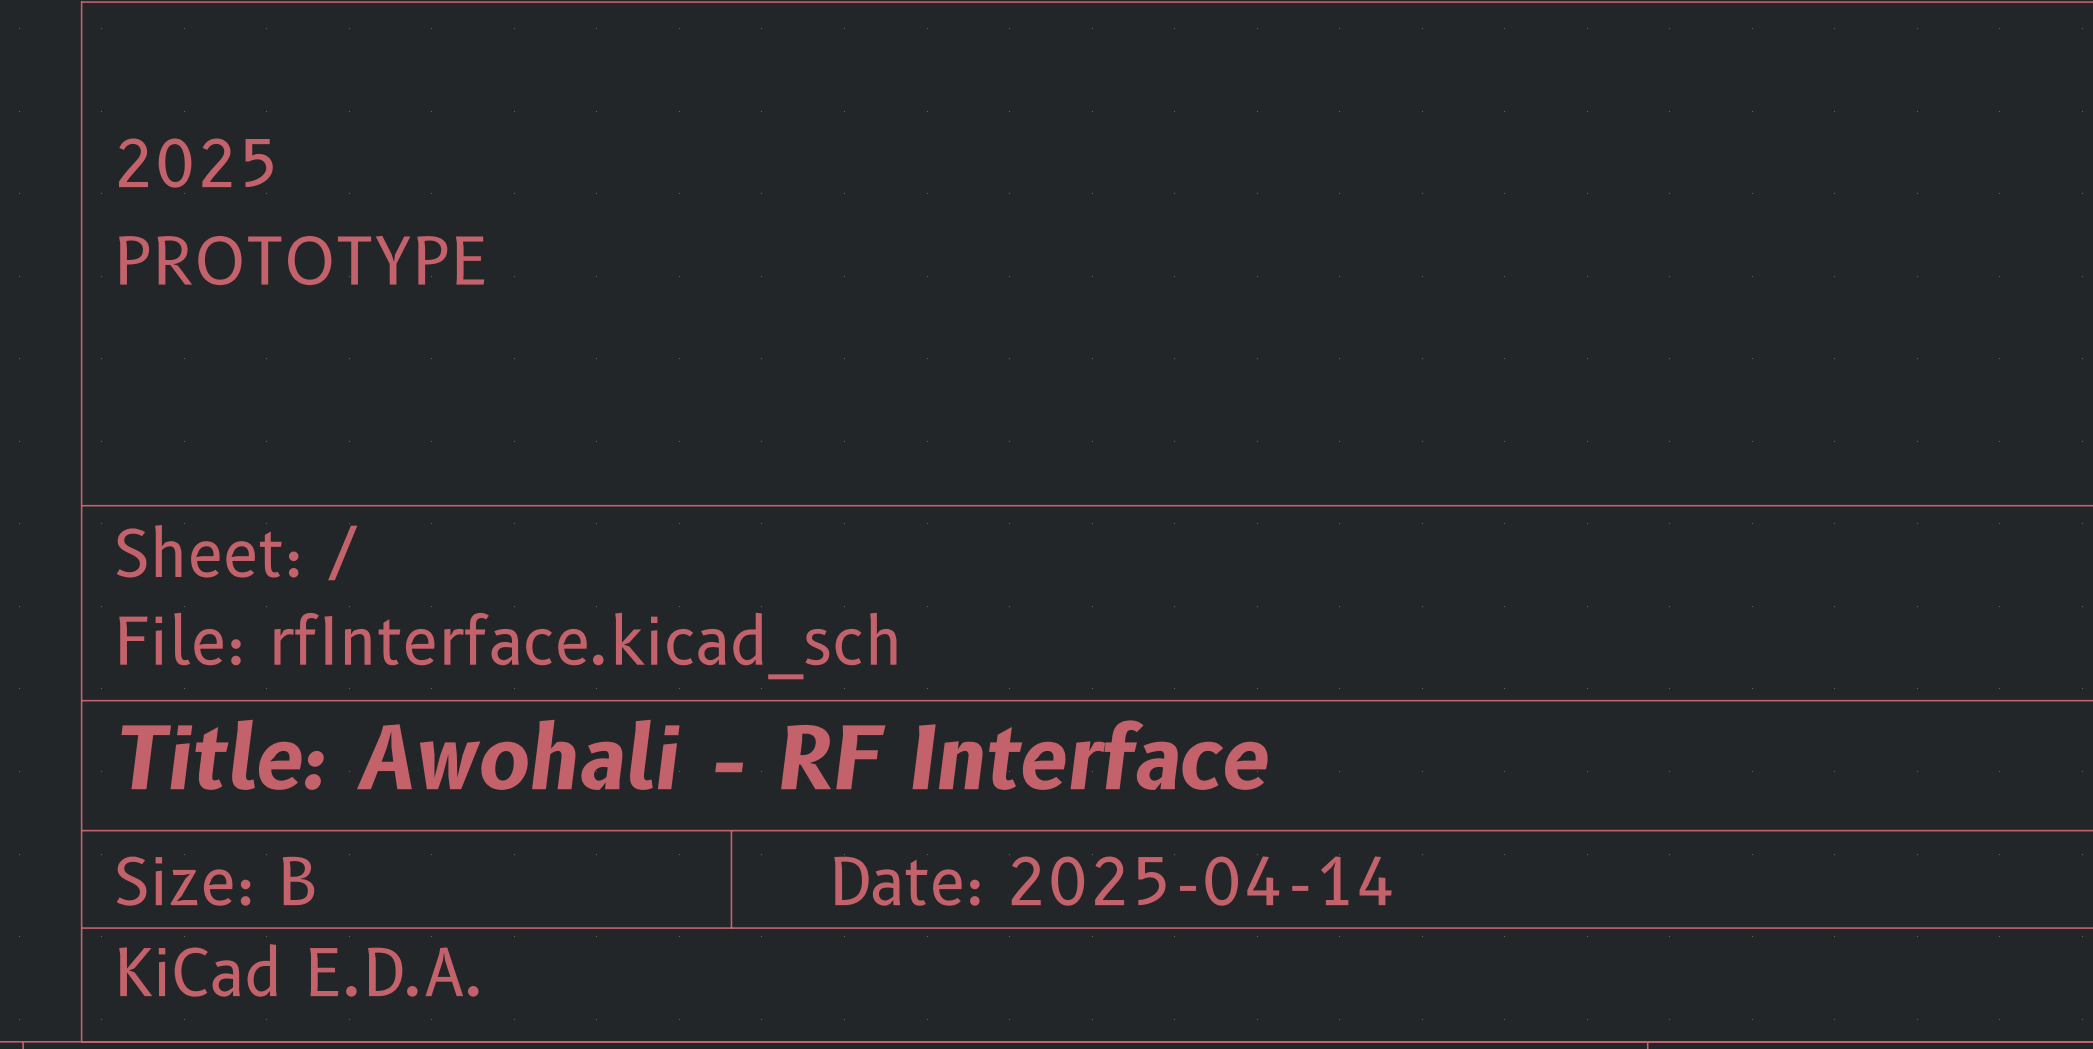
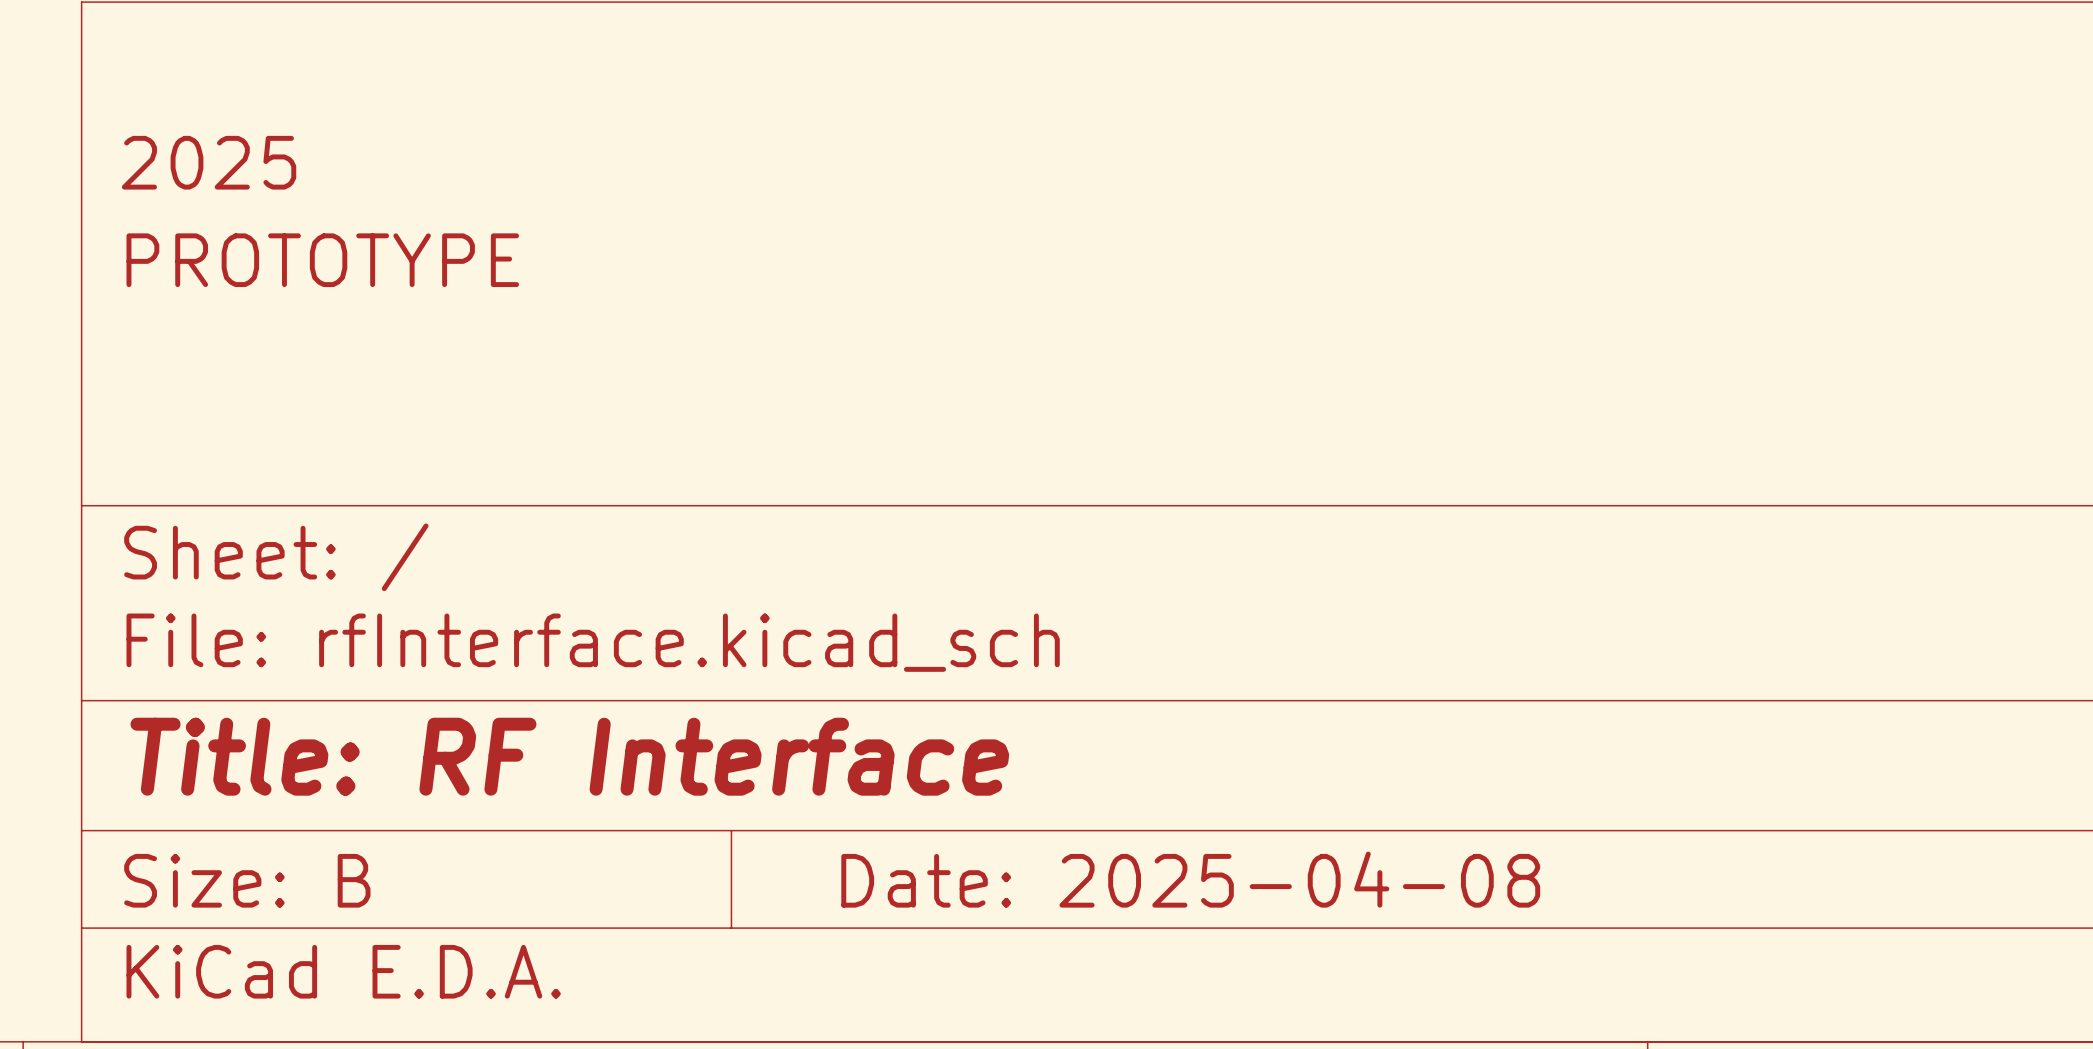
title block: Title: Awohali - RF Interface (694, 754) -> Title: RF Interface (569, 756)
title block: Date: 2025-04-14 (1113, 881) -> Date: 2025-04-08 (1190, 879)

